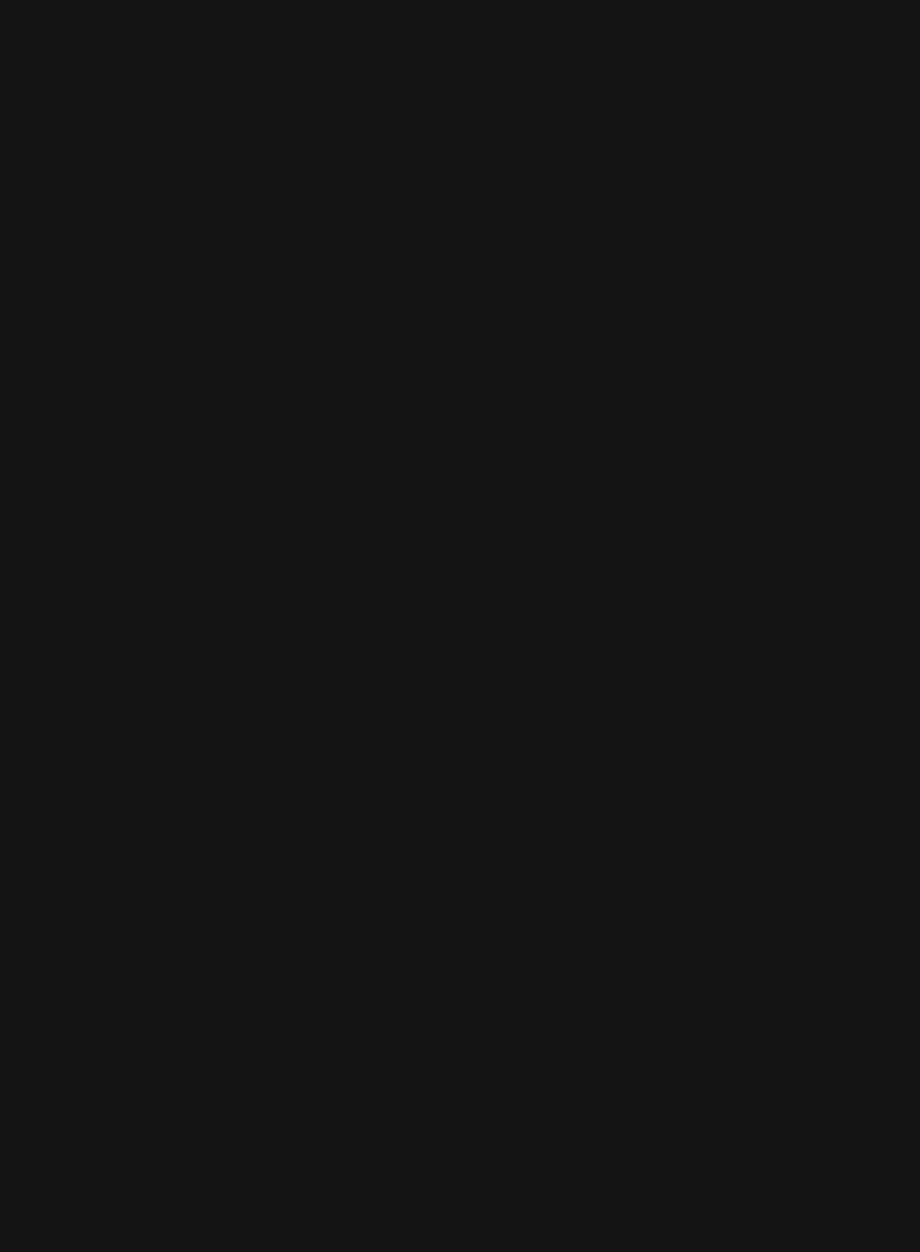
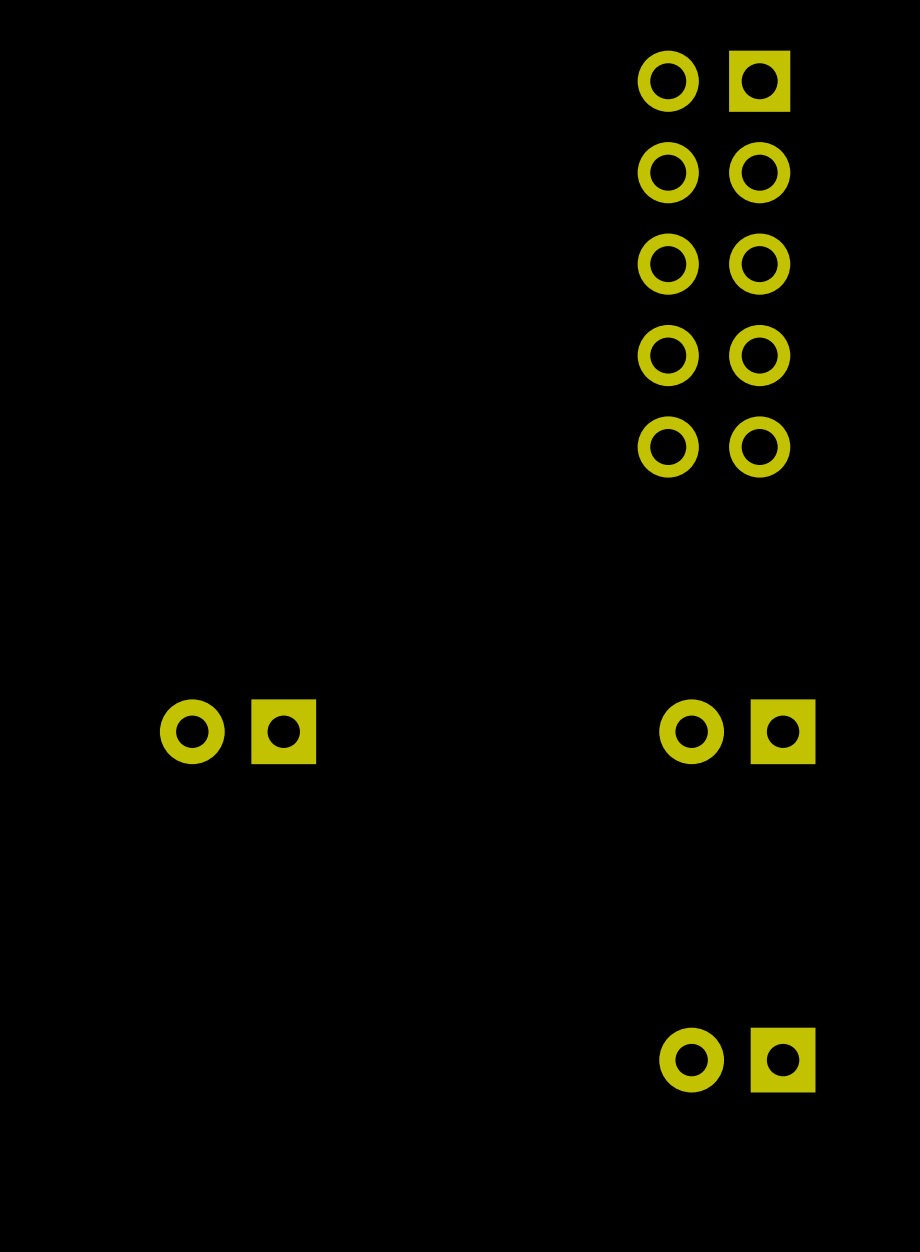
part: none -> (713, 264)
part: none -> (238, 731)
part: none -> (737, 731)
part: none -> (737, 1060)

